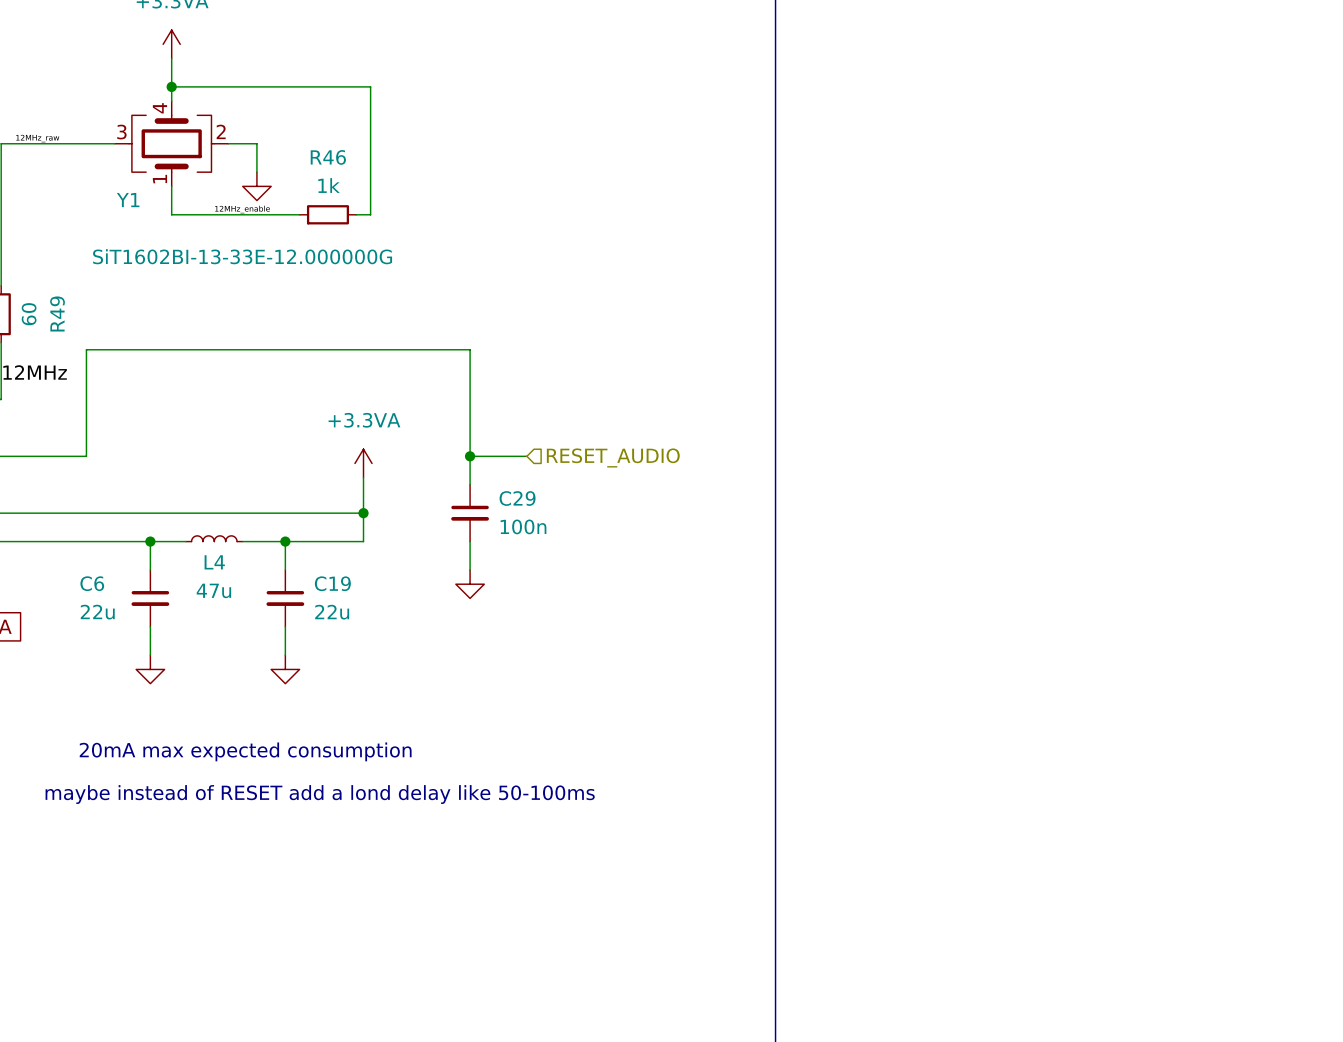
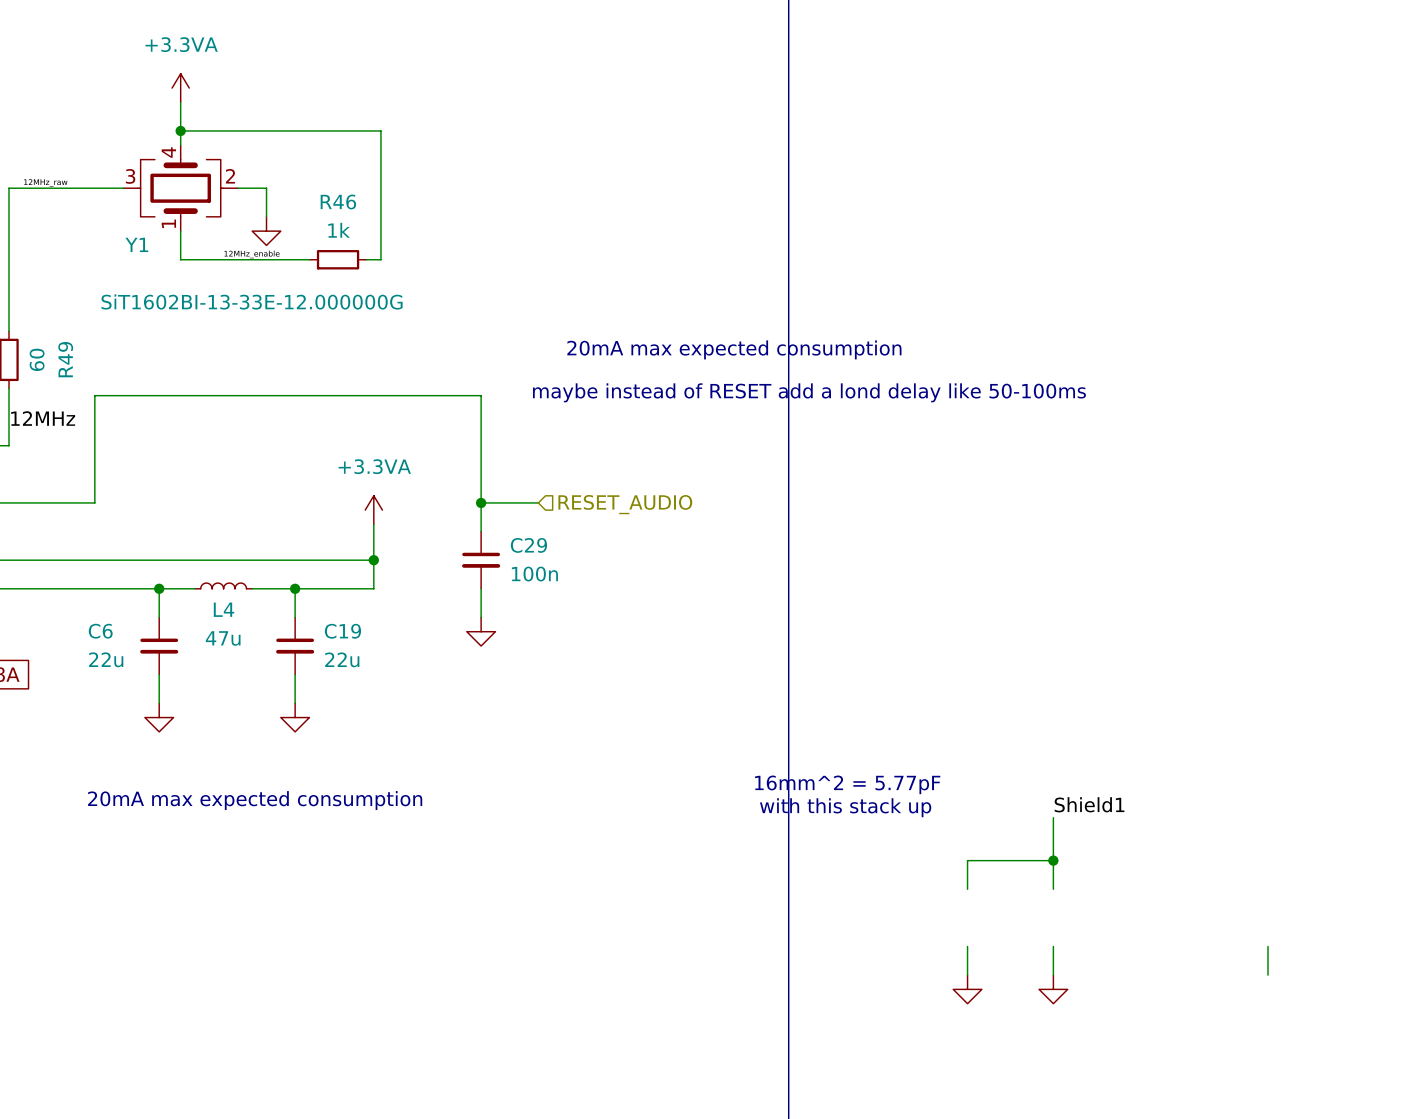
text: none -> 20mA max expected consumption (734, 349)
text: none -> maybe instead of RESET add a lond delay like 50-100ms (809, 392)
text: none -> 16mm^2 = 5.77pF (847, 784)
label: none -> Shield1 (1089, 804)
text: none -> with this stack up (845, 807)
wire: none -> (1053, 817) (1053, 889)
text: maybe instead of RESET add a lond delay like 50-100ms (320, 794) -> none
wire: none -> (1053, 860) (967, 860) (967, 889)
junction: none -> (1053, 860)
wire: none -> (967, 946) (967, 975)
wire: none -> (1053, 946) (1053, 975)
wire: none -> (1267, 946) (1267, 975)
power symbol: none -> (967, 989)
power symbol: none -> (1053, 989)

